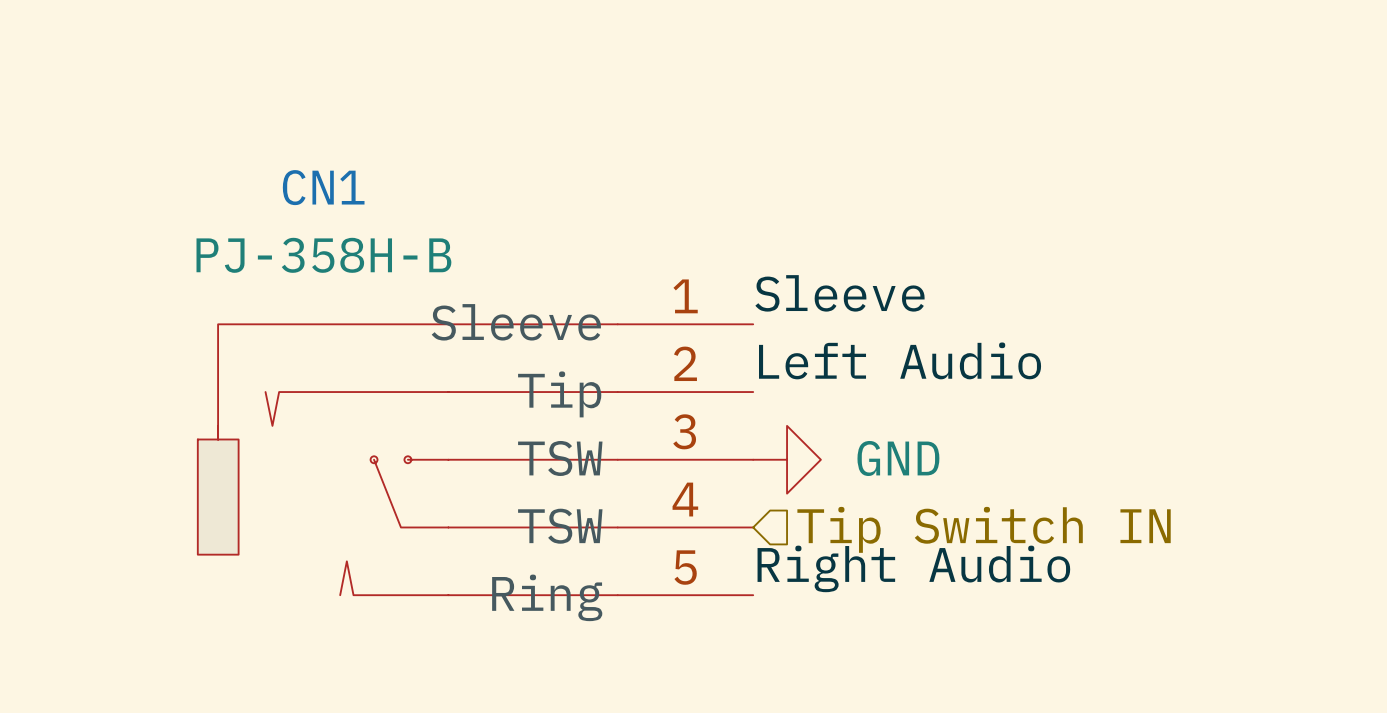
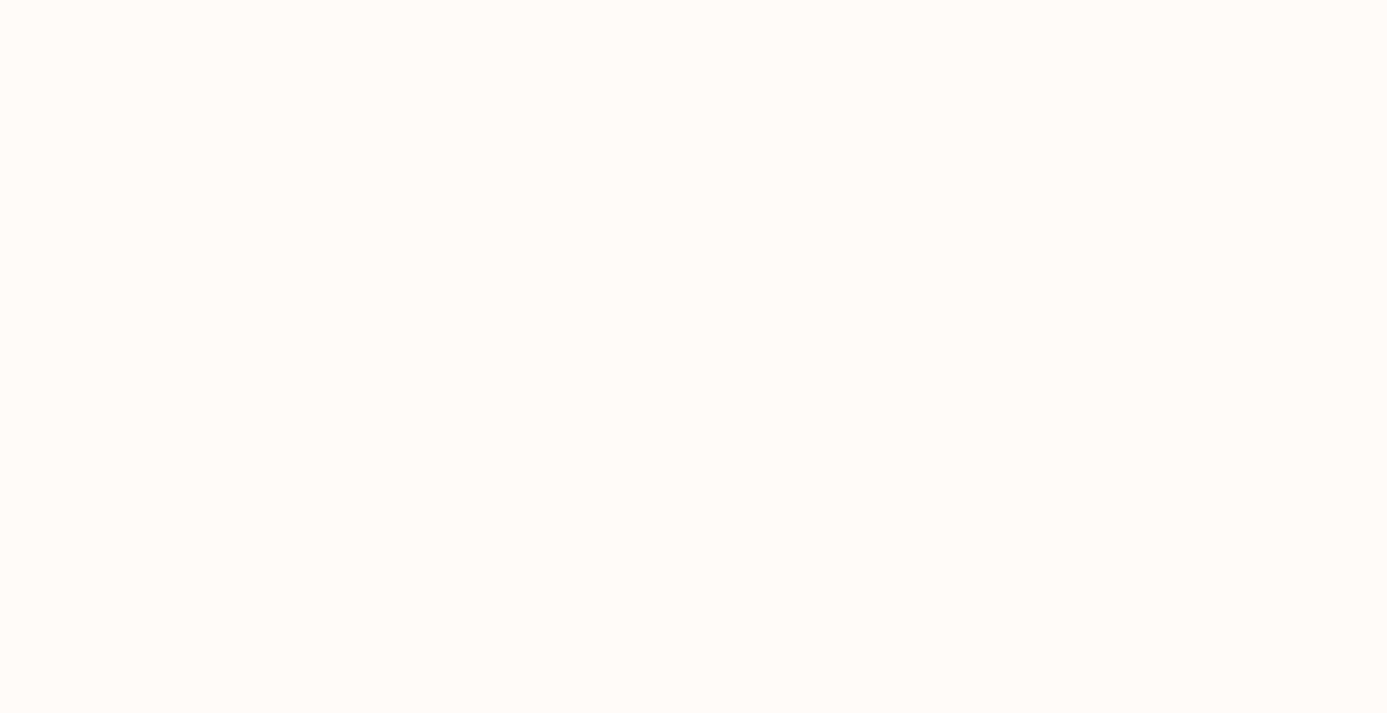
label: Sleeve (839, 293) -> none
label: Left Audio (900, 360) -> none
CN1: PJ-358H-B (475, 459) -> none
power symbol: GND (787, 459) -> none
hierarchical label: Tip Switch IN (984, 529) -> none
label: Right Audio (913, 568) -> none

